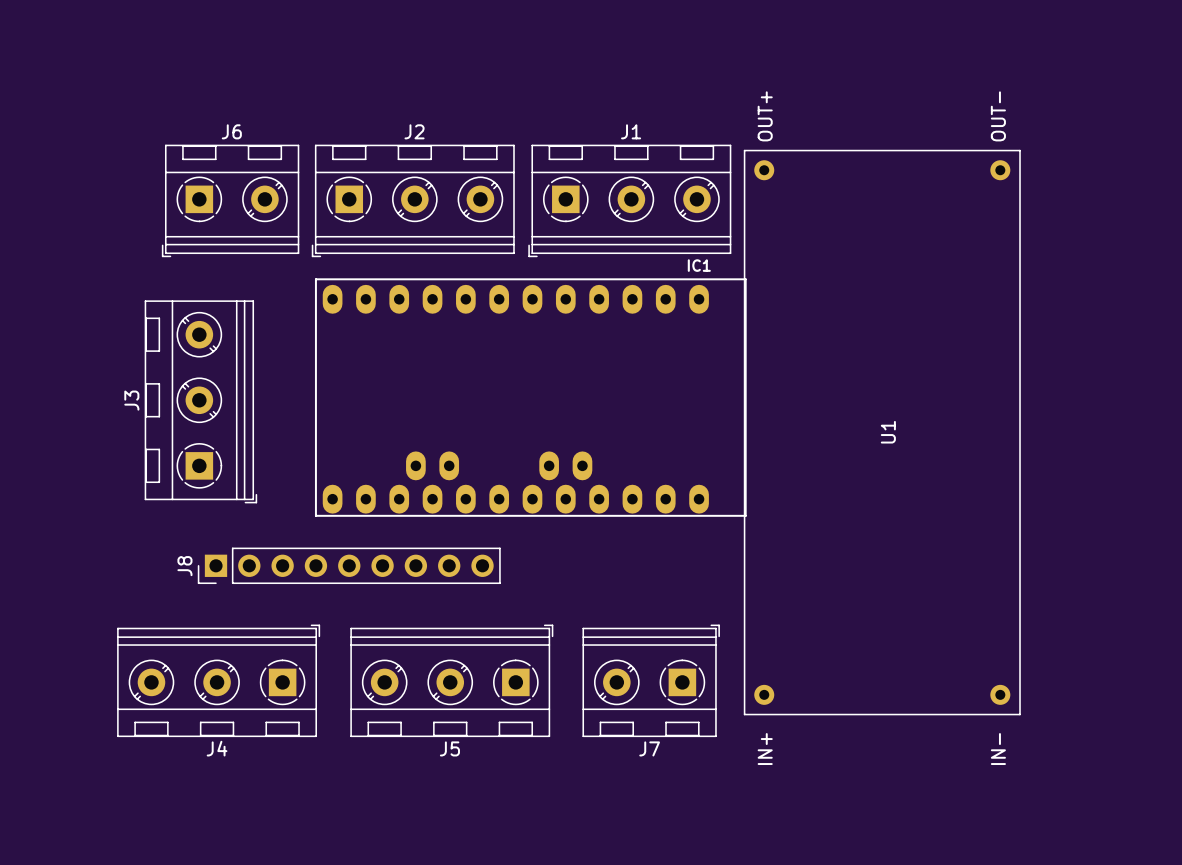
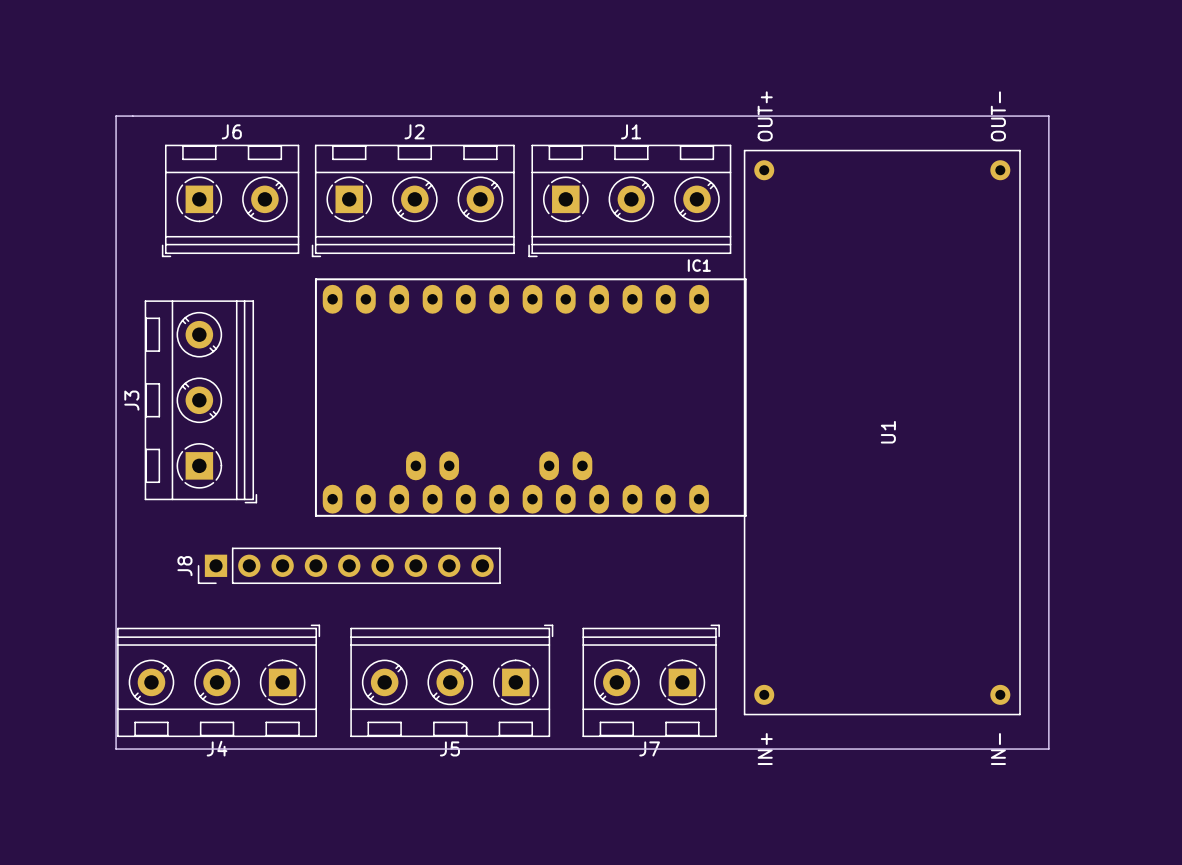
board edge: none -> (116, 116) (1048, 116) (1048, 749) (116, 749) (116, 116)

